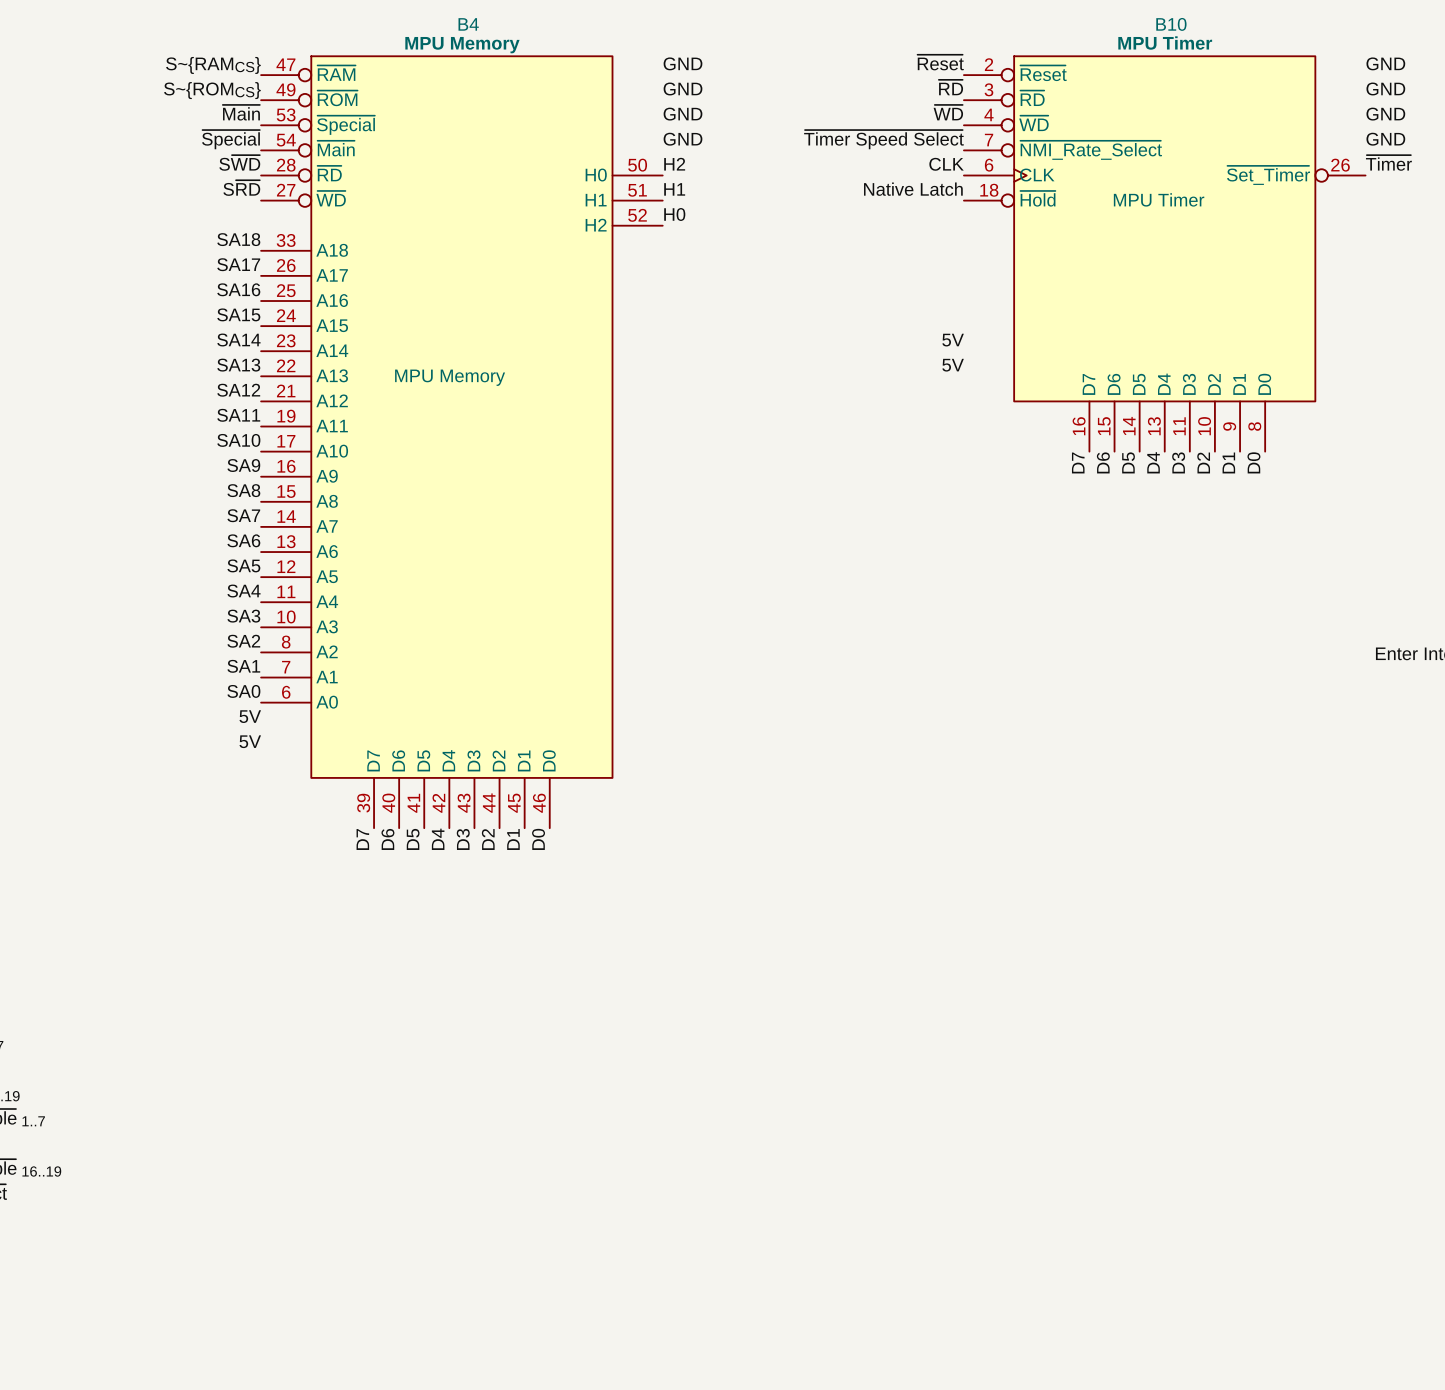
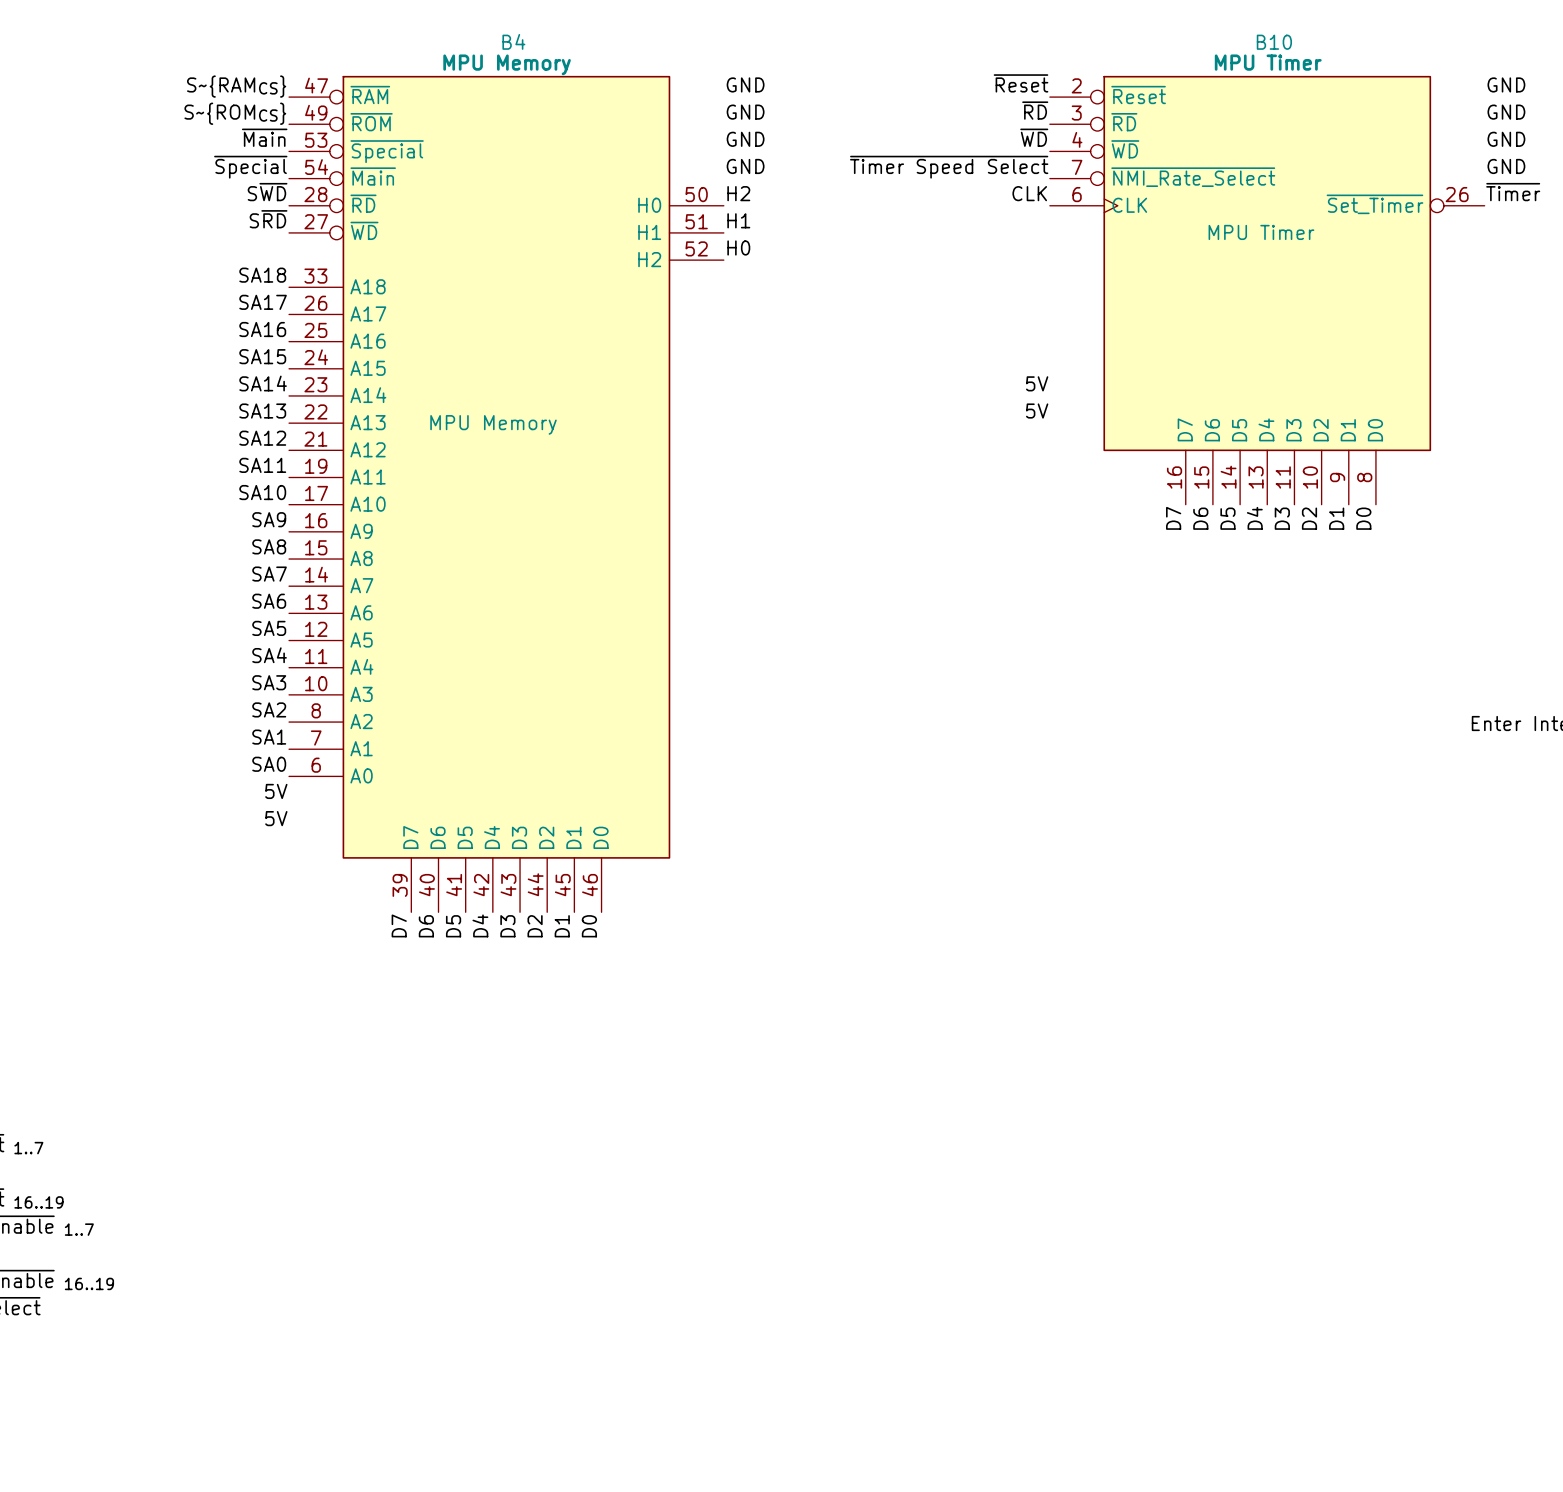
B10 symbol: [963, 55, 1366, 452] -> [1049, 75, 1485, 505]
label: Native Latch (913, 189) -> none

